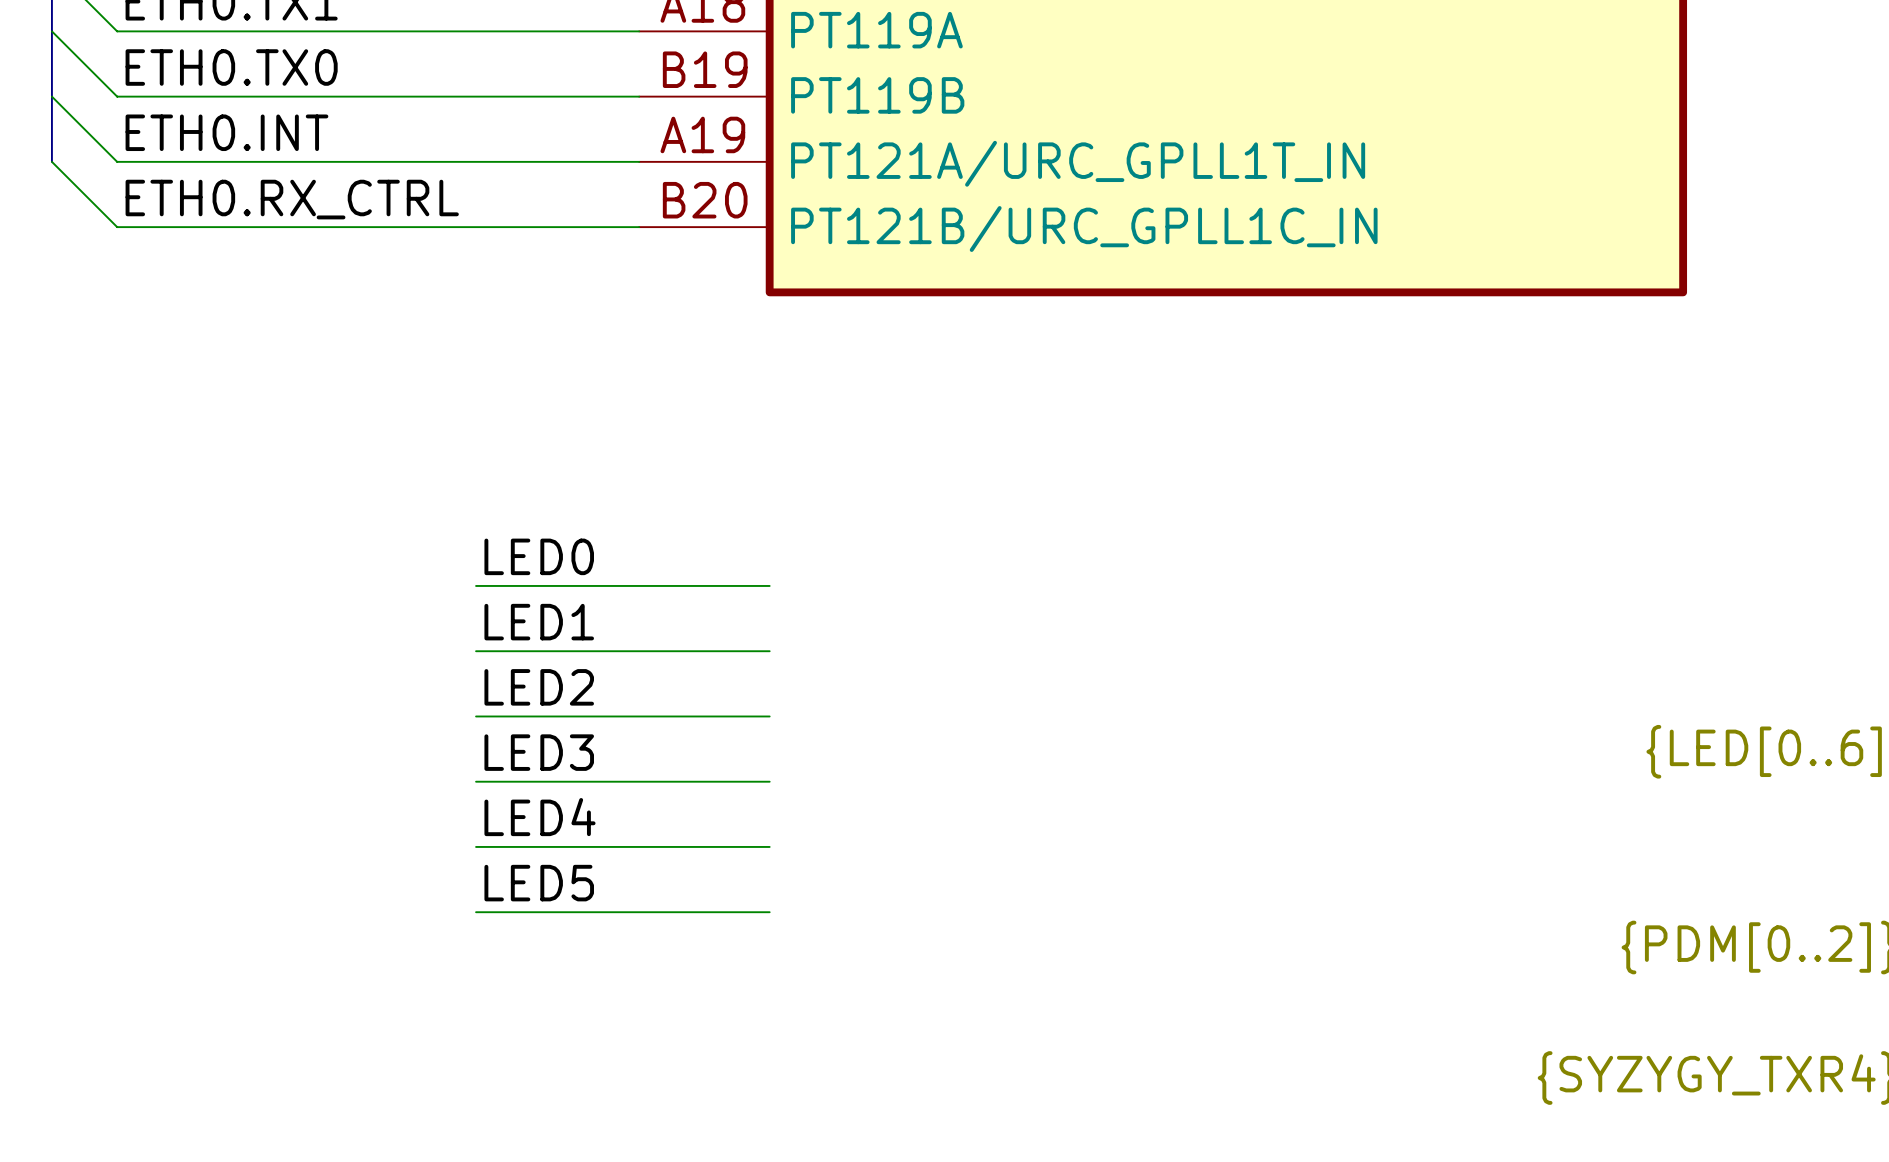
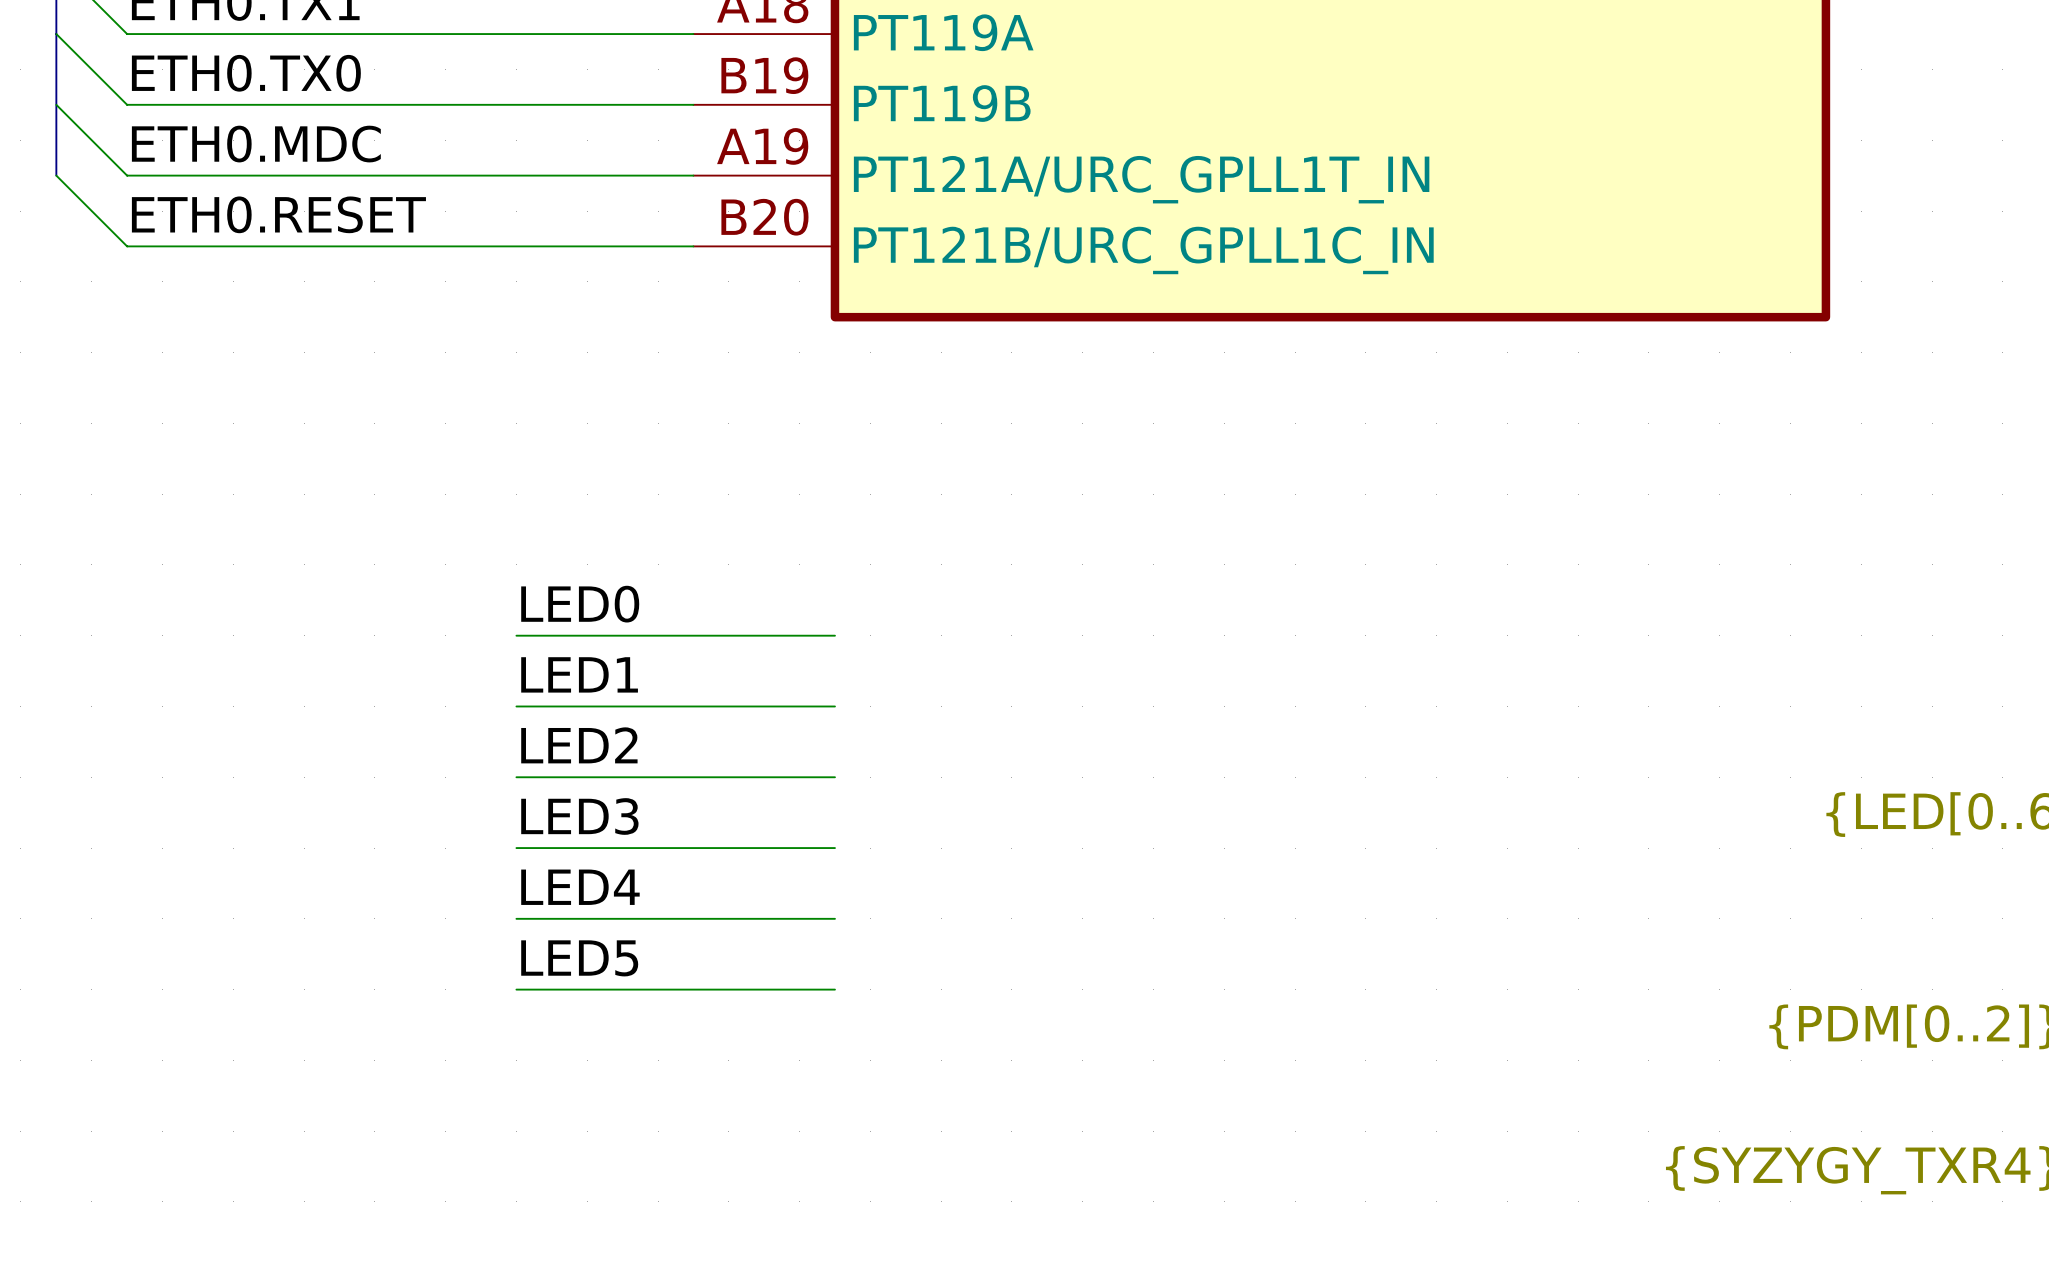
label: ETH0.INT (226, 132) -> ETH0.MDC (256, 144)
label: ETH0.RX_CTRL (292, 199) -> ETH0.RESET (278, 214)

